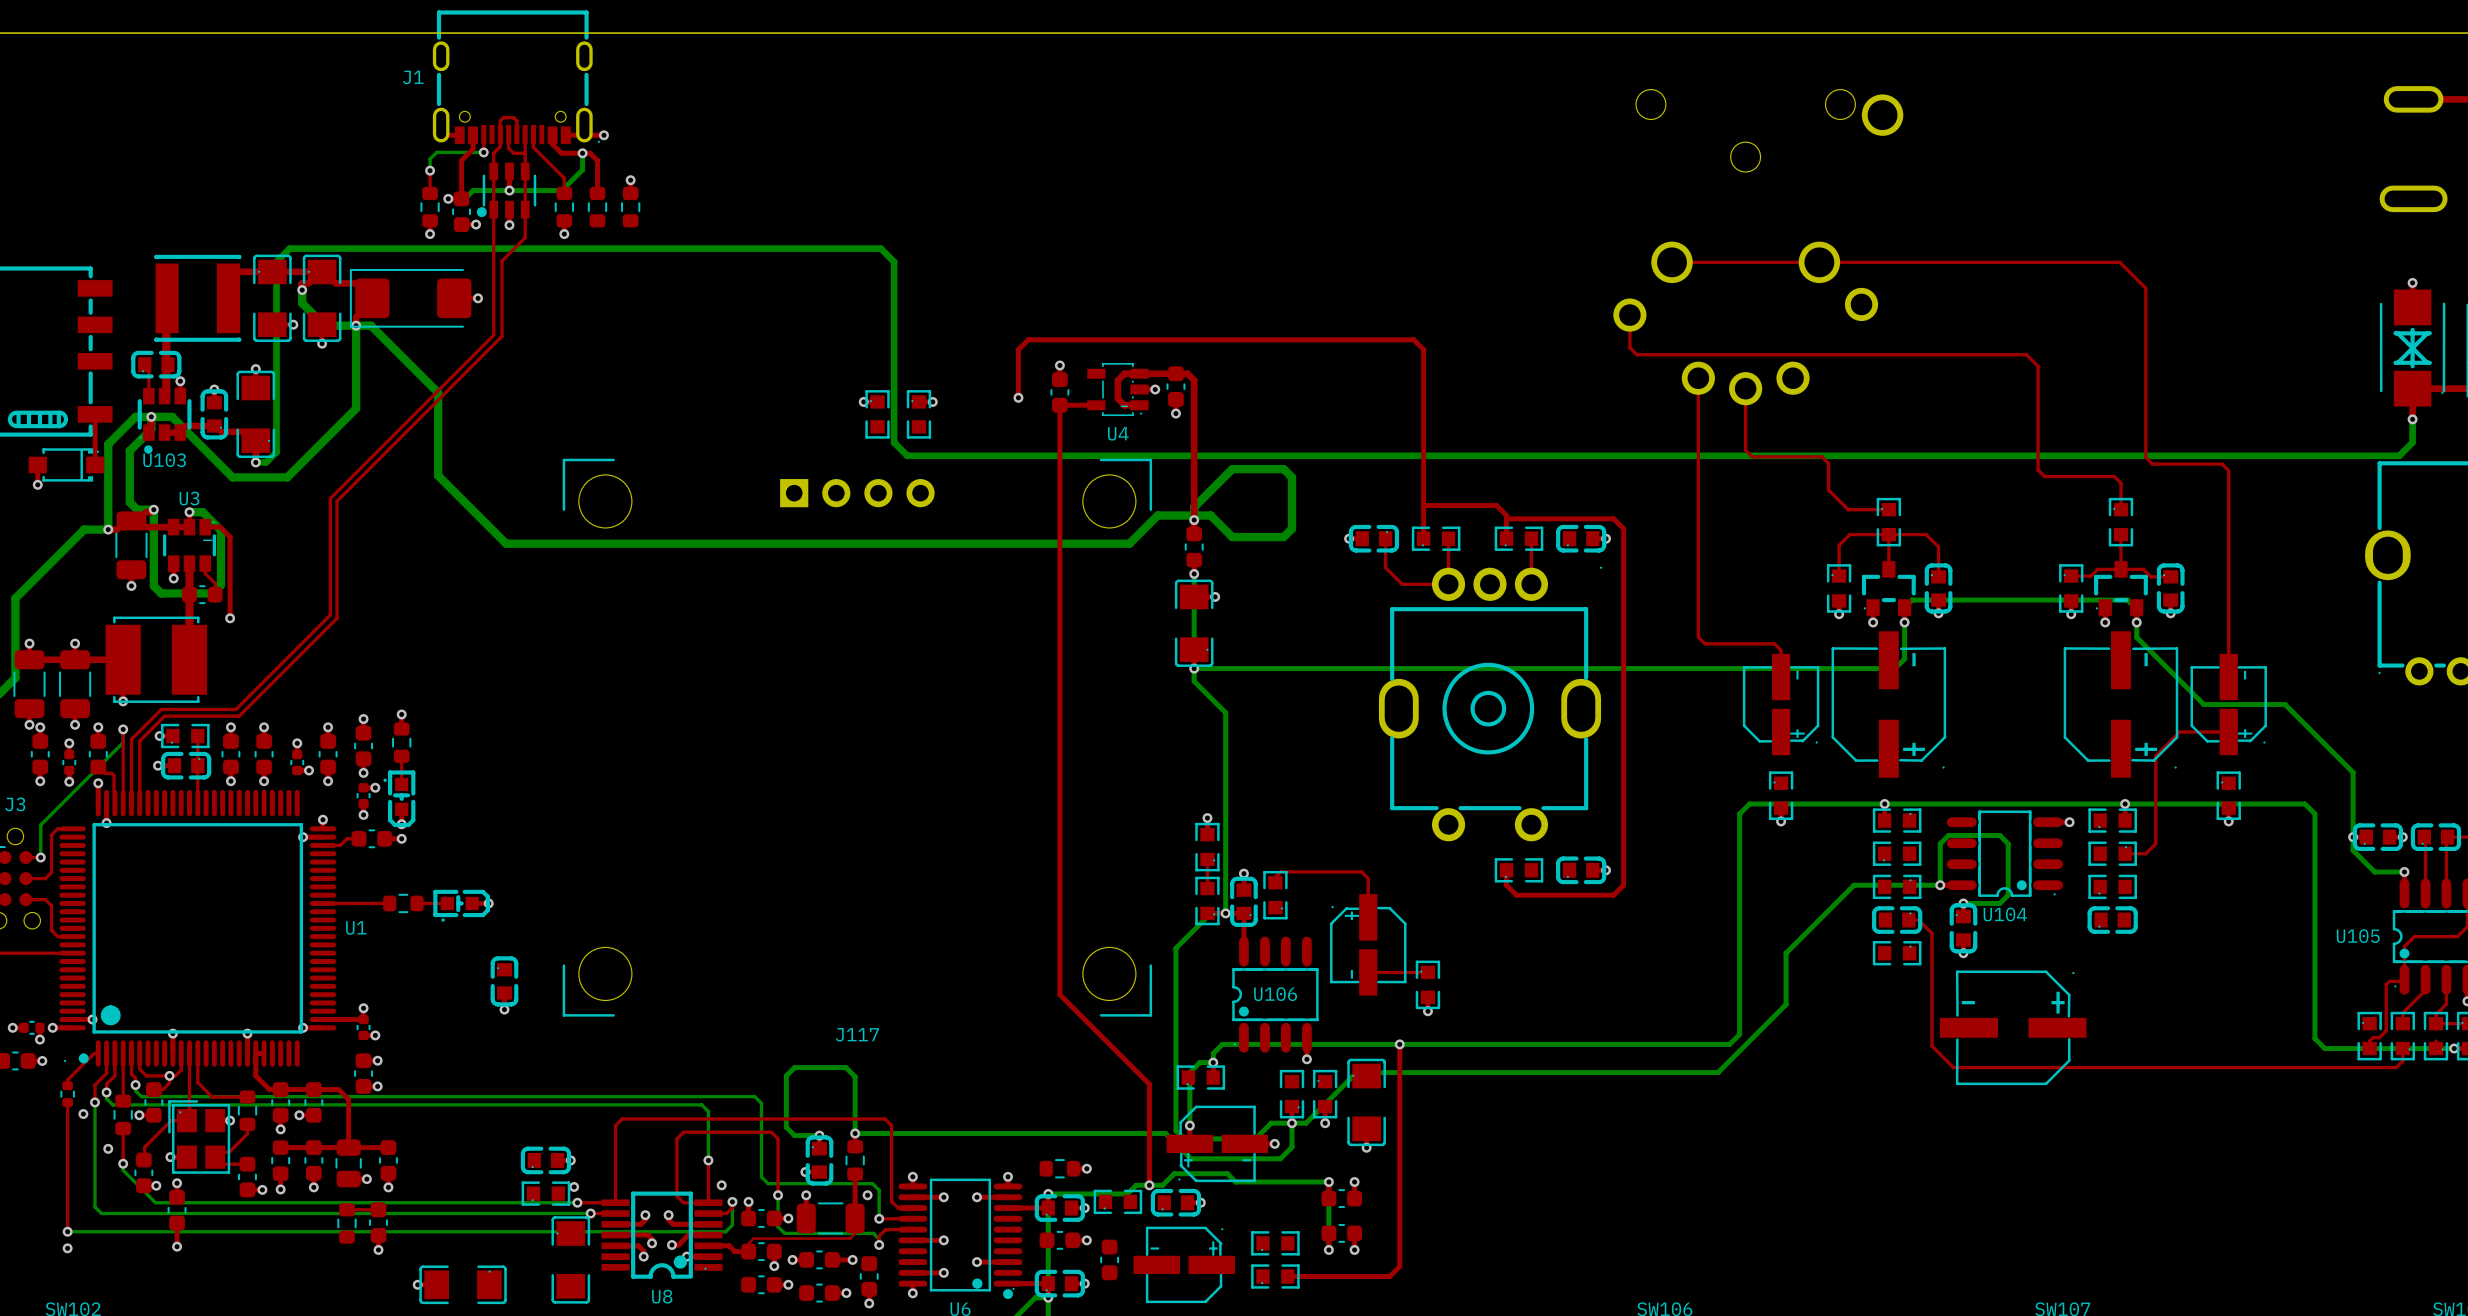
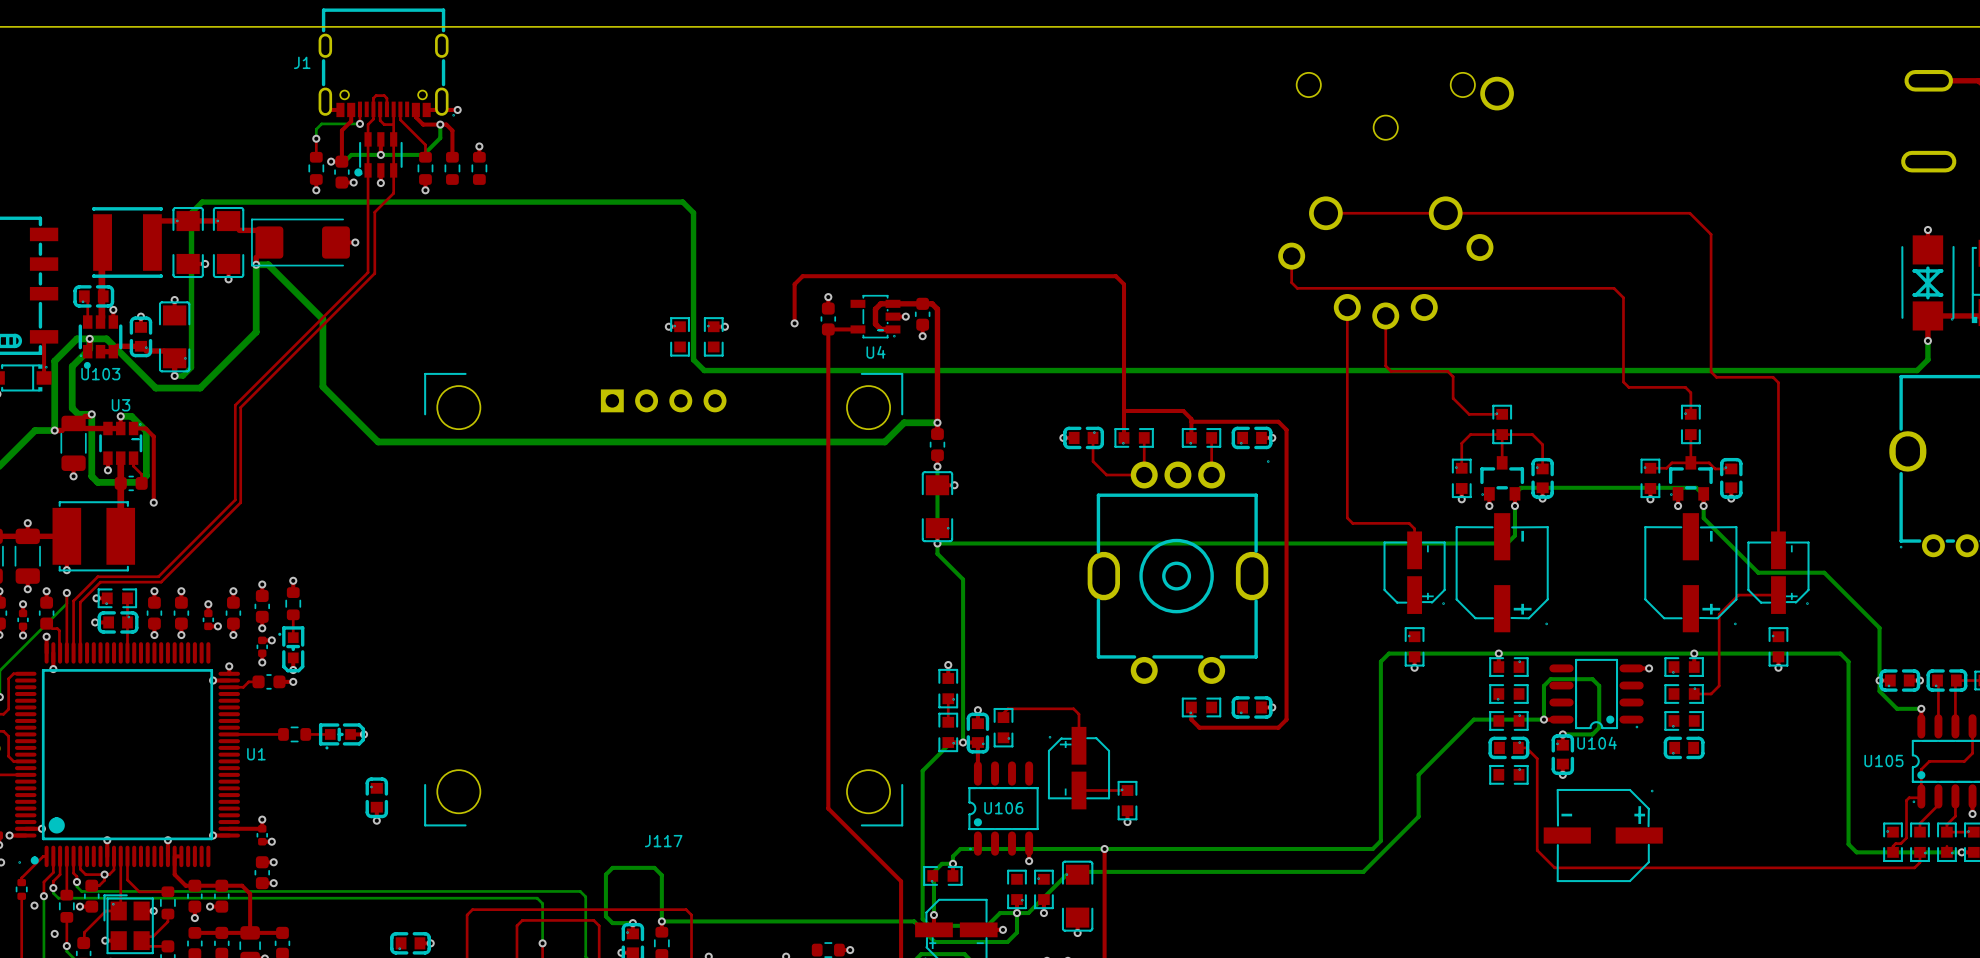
top track: (308, 283) (302, 283) (302, 290) -> none
bottom track: (302, 290) (302, 303) (324, 325) (356, 325) -> none
via: (302, 290) -> none
bottom track: (1153, 520) (1157, 515) (1210, 515) (1232, 537) (1283, 537) (1292, 528) (1292, 477) (1283, 469) (1232, 469) (1194, 507) (1194, 520) -> (904, 422) (937, 422)

